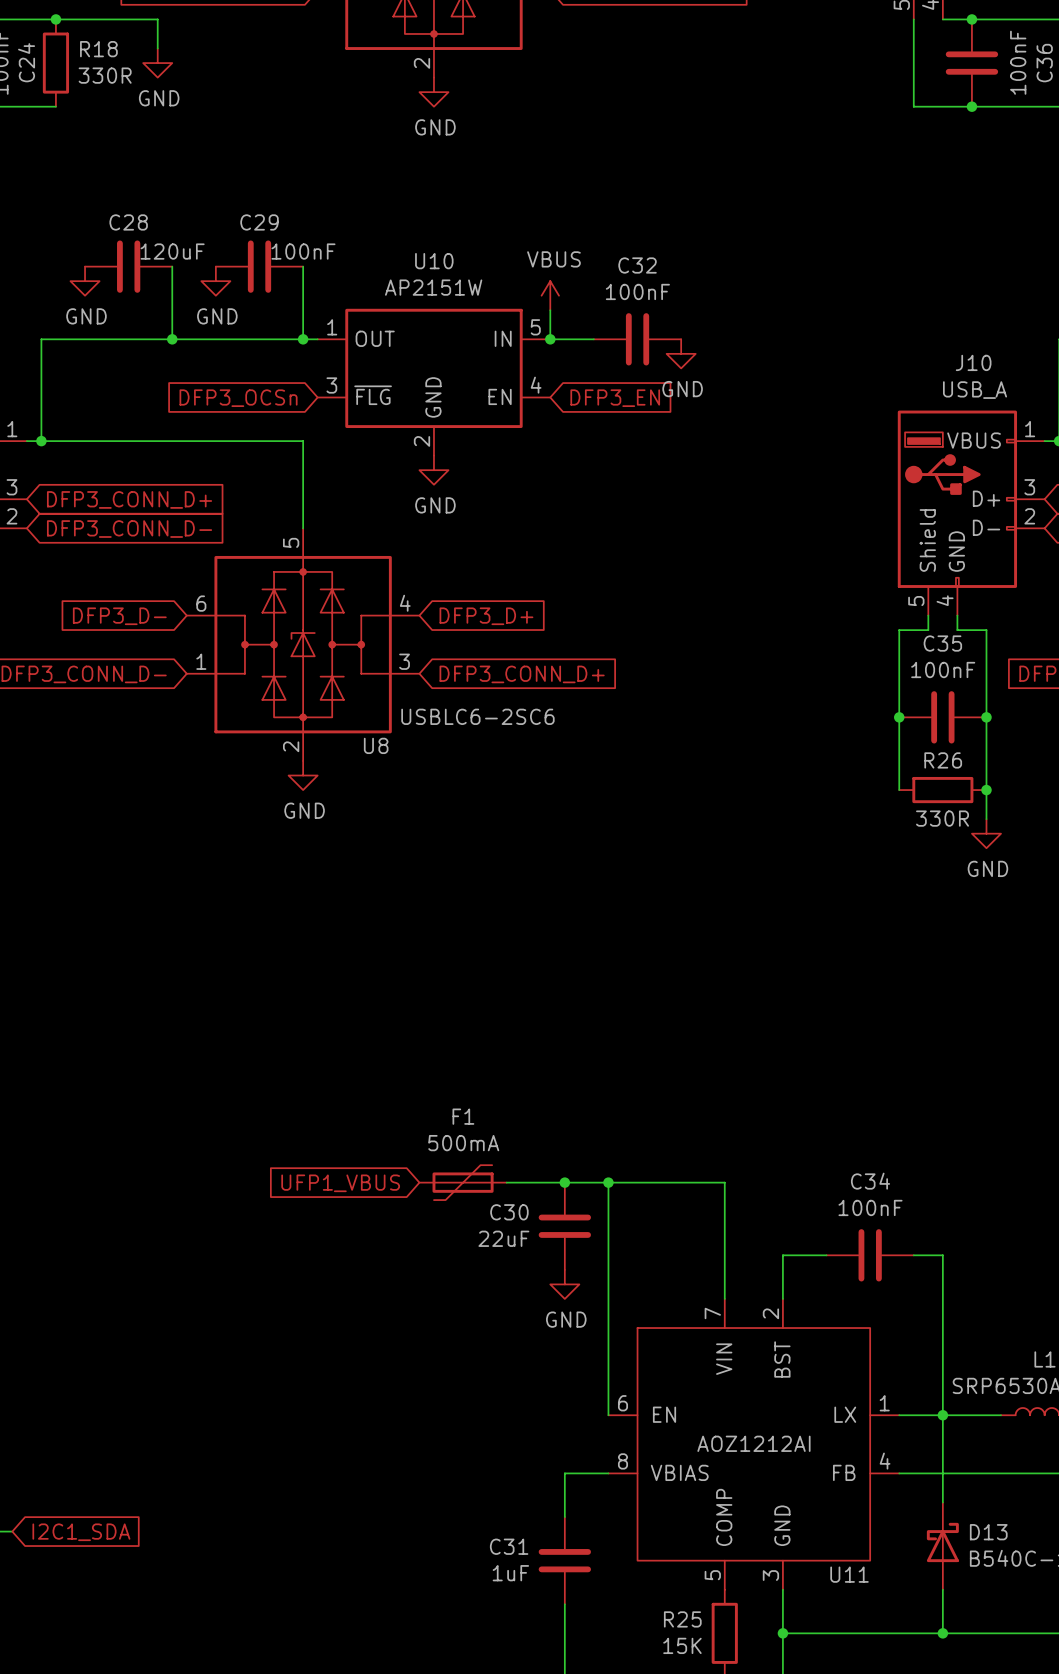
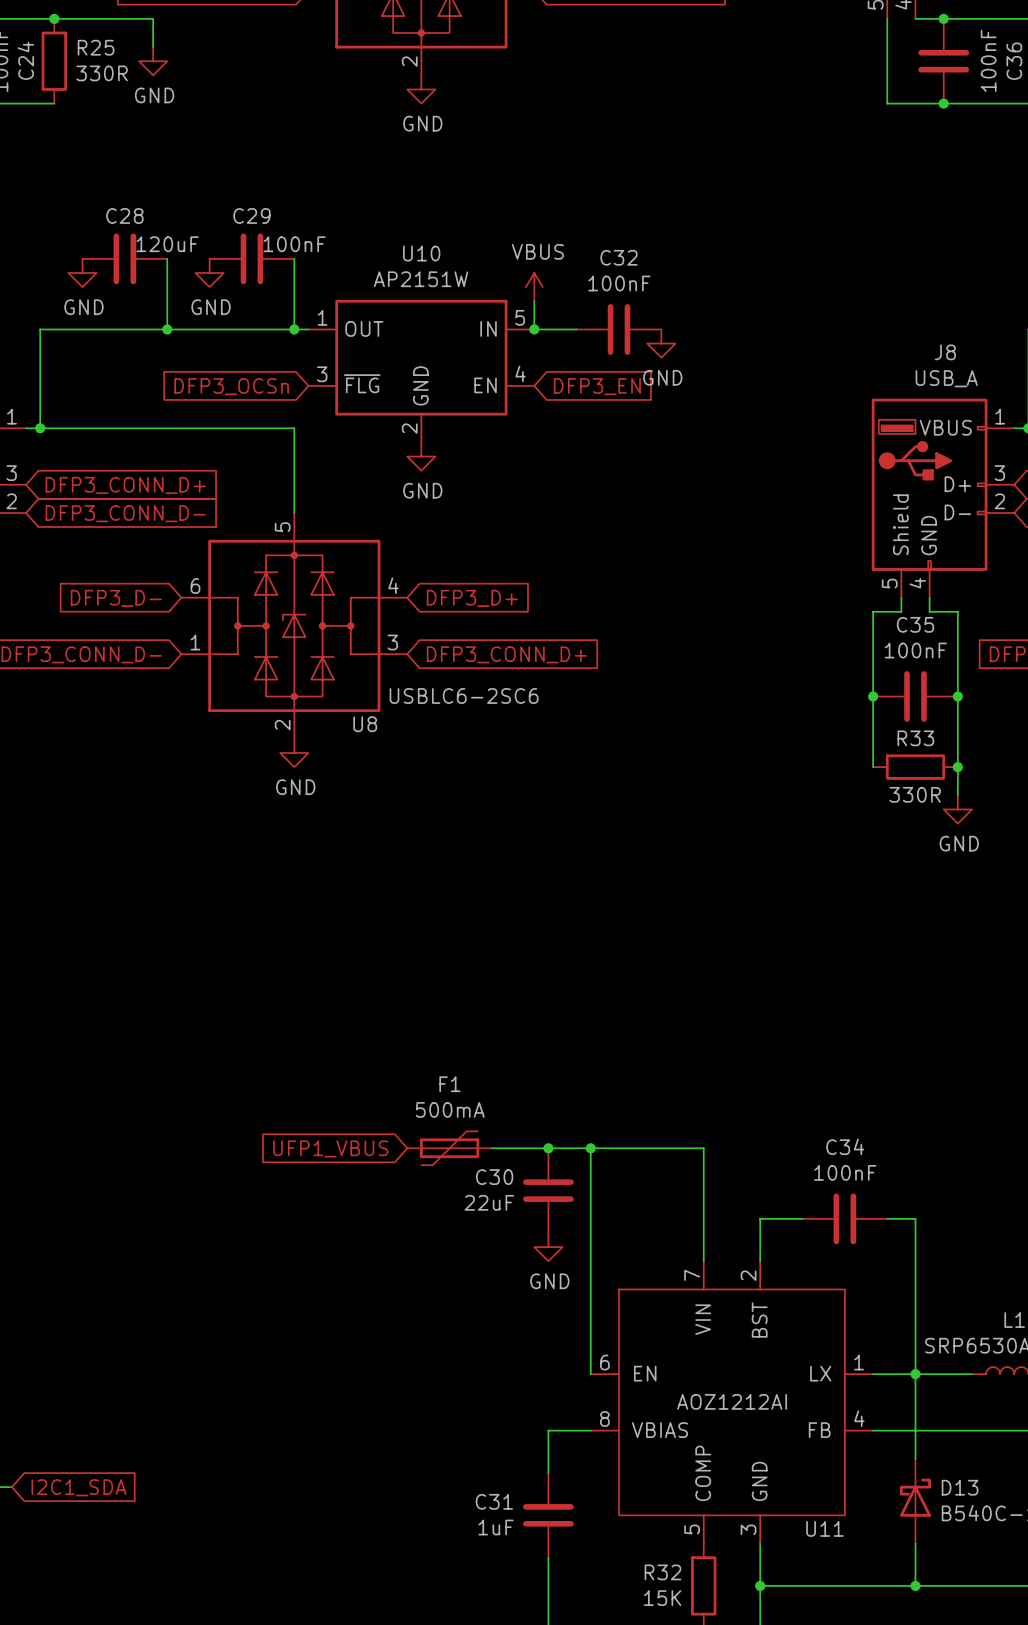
R18 name: R18 (98, 49) -> R25 (96, 47)
J10 name: J10 (973, 362) -> J8 (945, 352)
R26 name: R26 (943, 760) -> R33 (915, 738)
R25 name: R25 (682, 1619) -> R32 (662, 1572)

